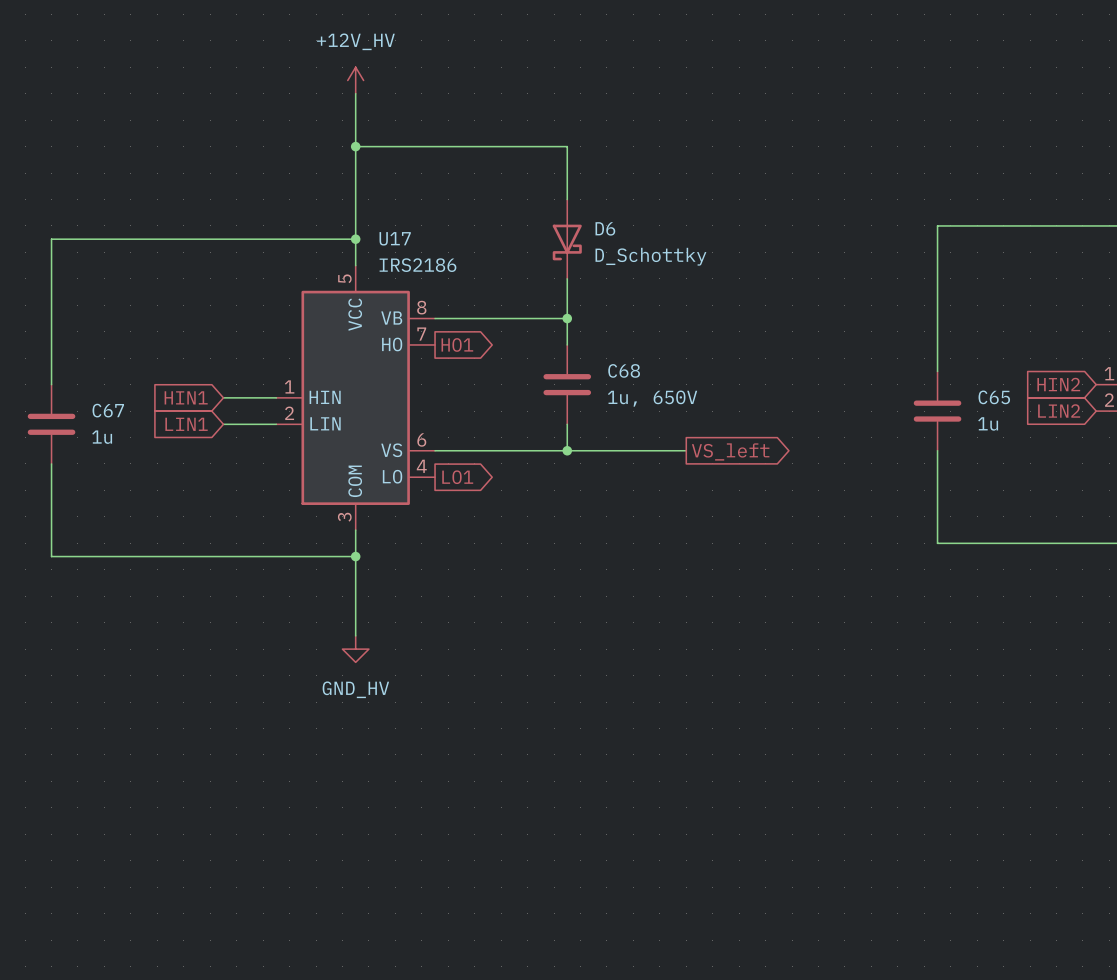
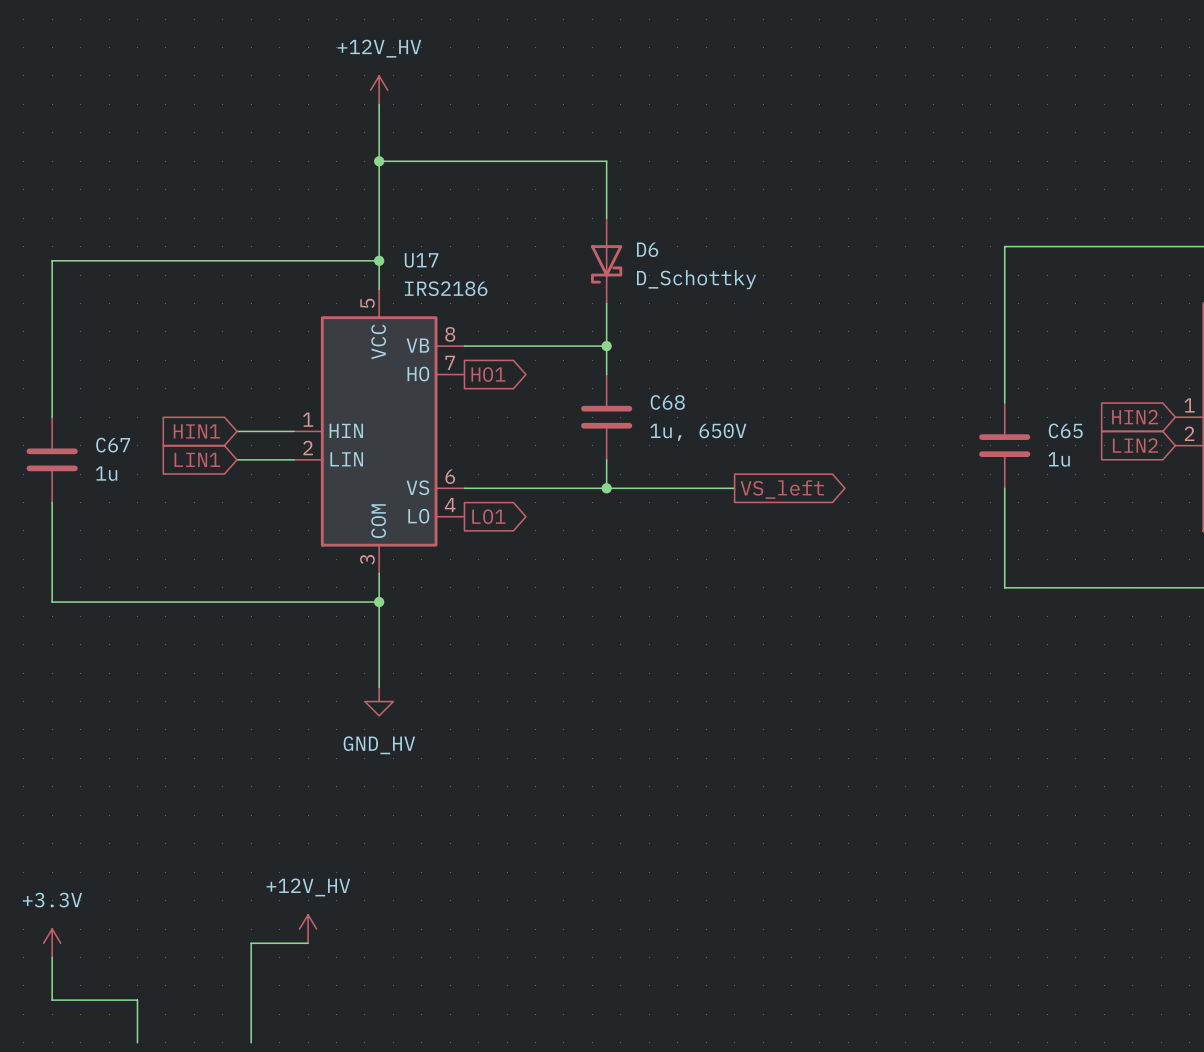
power symbol: none -> +12V_HV (308, 929)
power symbol: none -> +3.3V (52, 943)
wire: none -> (308, 943) (251, 943) (251, 1042)
wire: none -> (52, 957) (52, 1000) (137, 1000) (137, 1042)

